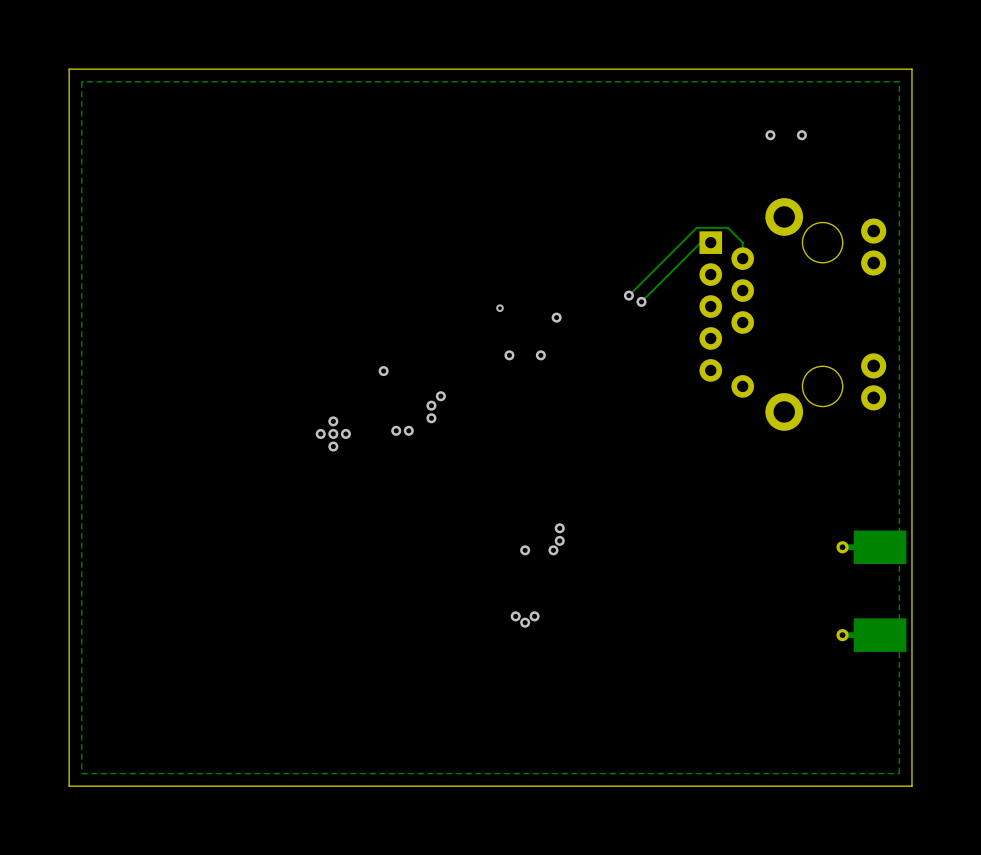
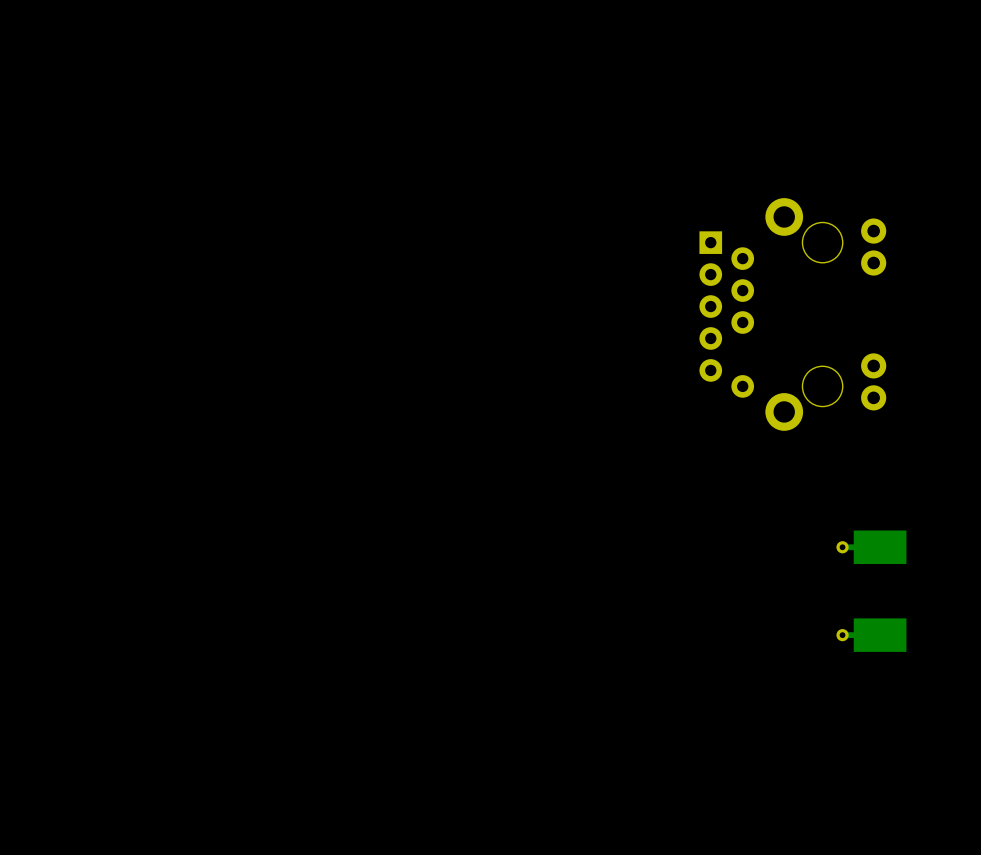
board edge: (911, 69) (69, 69) (69, 786) (911, 786) (911, 69) -> none
zone outline: (899, 81) (899, 773) (81, 773) (81, 81) (899, 81) -> none
via: (770, 135) -> none
via: (801, 135) -> none
track: (710, 242) (700, 242) (641, 301) -> none
track: (742, 258) (742, 242) (727, 227) (696, 227) (628, 295) -> none
via: (628, 295) -> none
via: (641, 301) -> none
via: (500, 308) -> none
via: (556, 317) -> none
via: (509, 355) -> none
via: (540, 355) -> none
via: (383, 371) -> none
via: (440, 396) -> none
via: (431, 405) -> none
via: (431, 418) -> none
via: (333, 421) -> none
via: (396, 430) -> none
via: (408, 430) -> none
via: (320, 433) -> none
via: (333, 433) -> none
via: (345, 433) -> none
via: (333, 446) -> none
via: (559, 528) -> none
via: (559, 540) -> none
via: (525, 550) -> none
via: (553, 550) -> none
via: (515, 616) -> none
via: (534, 616) -> none
via: (525, 622) -> none

